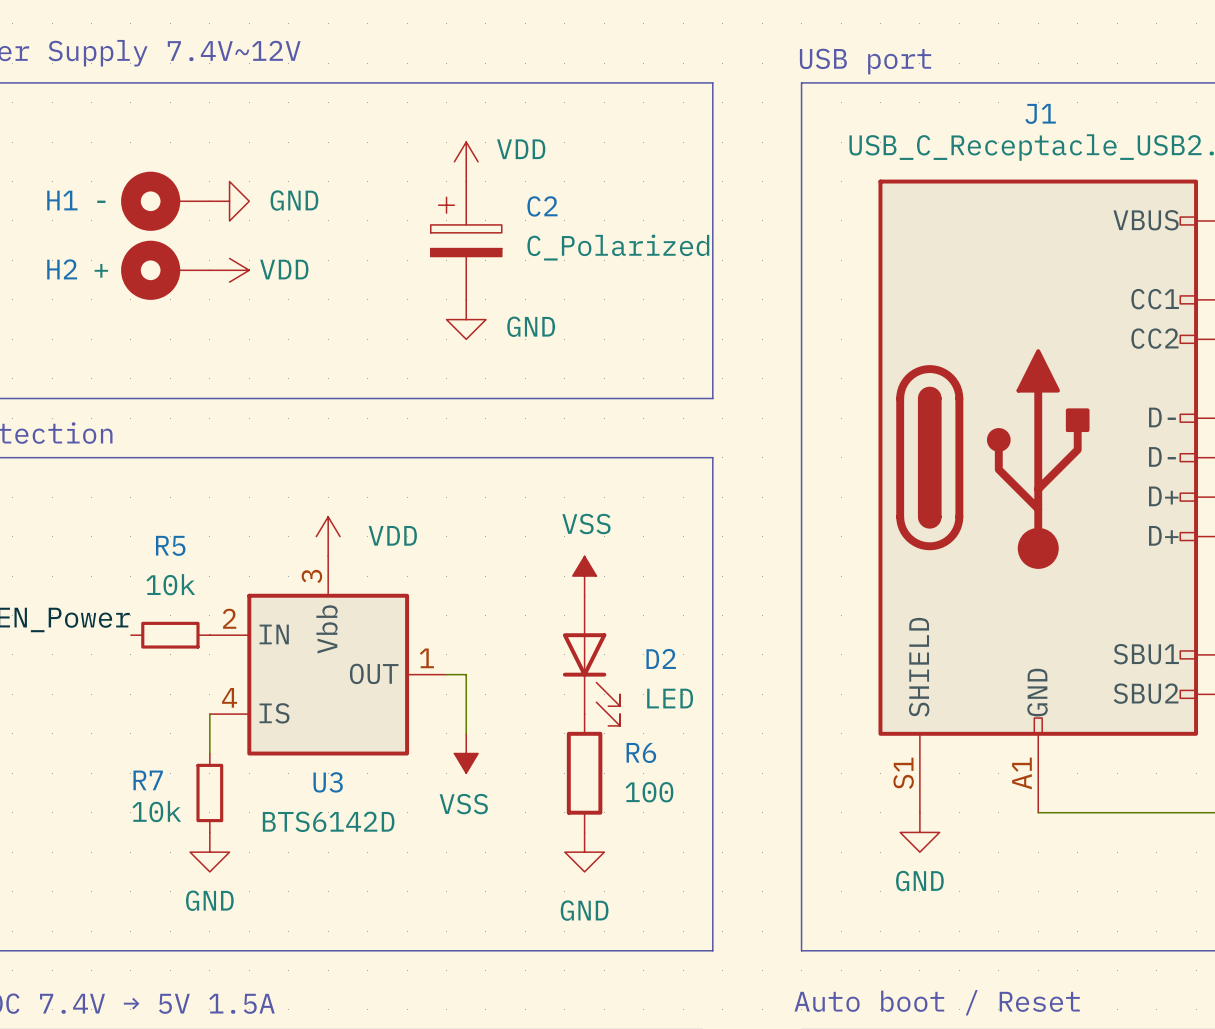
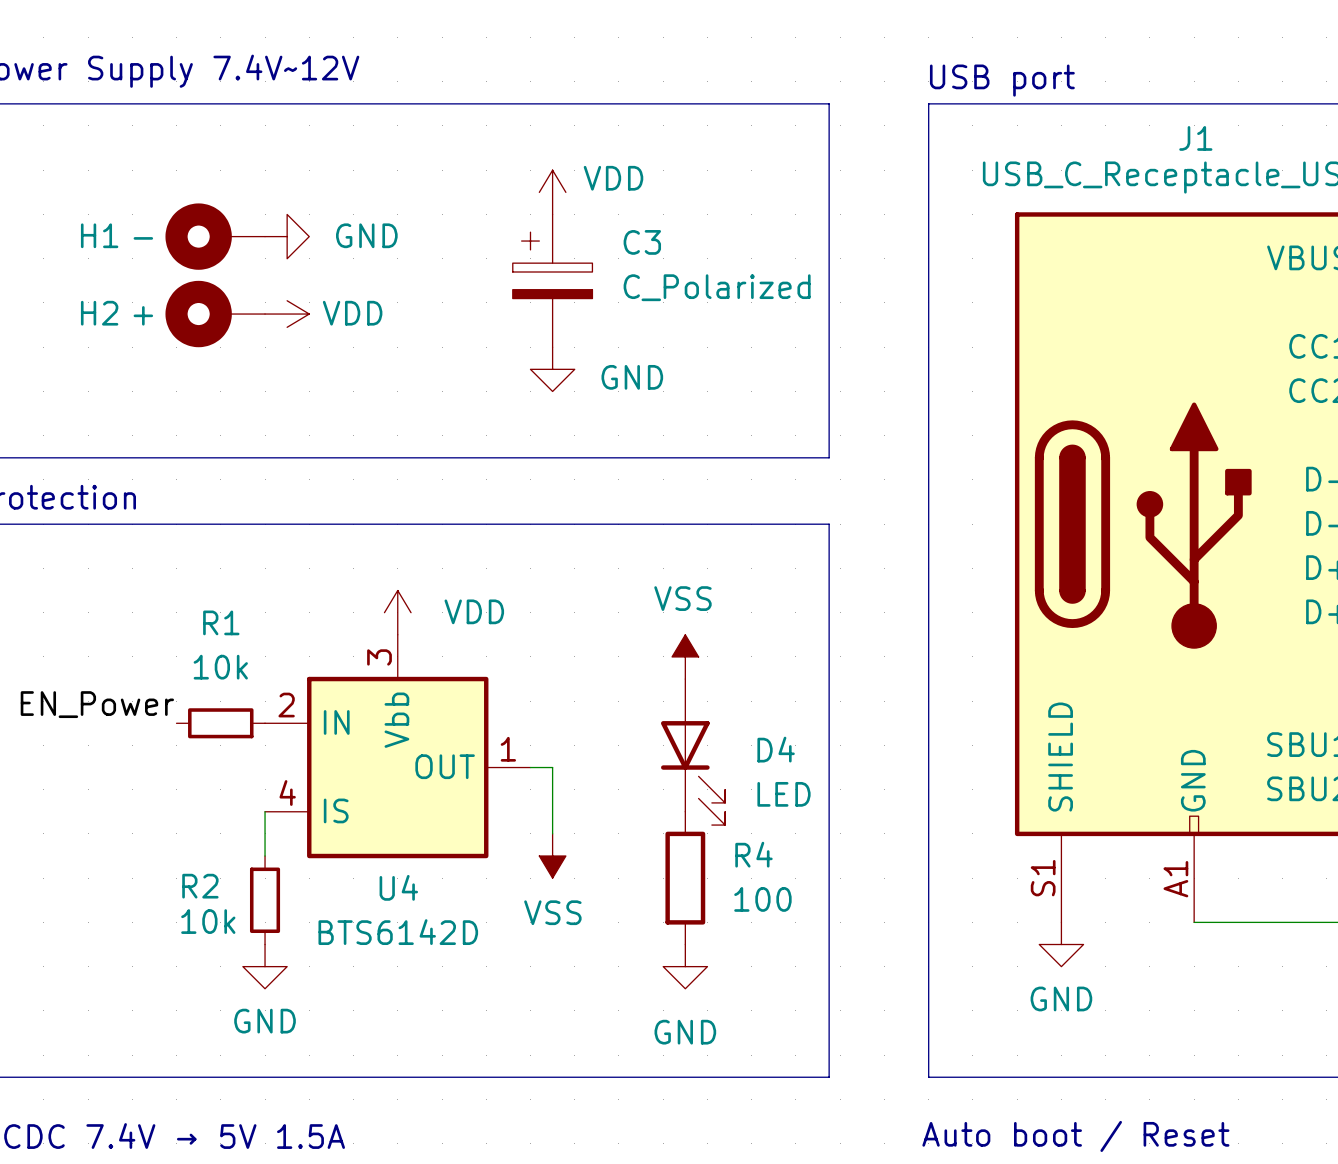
C2 name: C2 (542, 206) -> C3 (642, 242)
R5 name: R5 (170, 545) -> R1 (221, 622)
D2 name: D2 (661, 658) -> D4 (776, 749)
R6 name: R6 (641, 752) -> R4 (753, 854)
R7 name: R7 (148, 780) -> R2 (200, 886)
U3 name: U3 (328, 782) -> U4 (398, 887)

